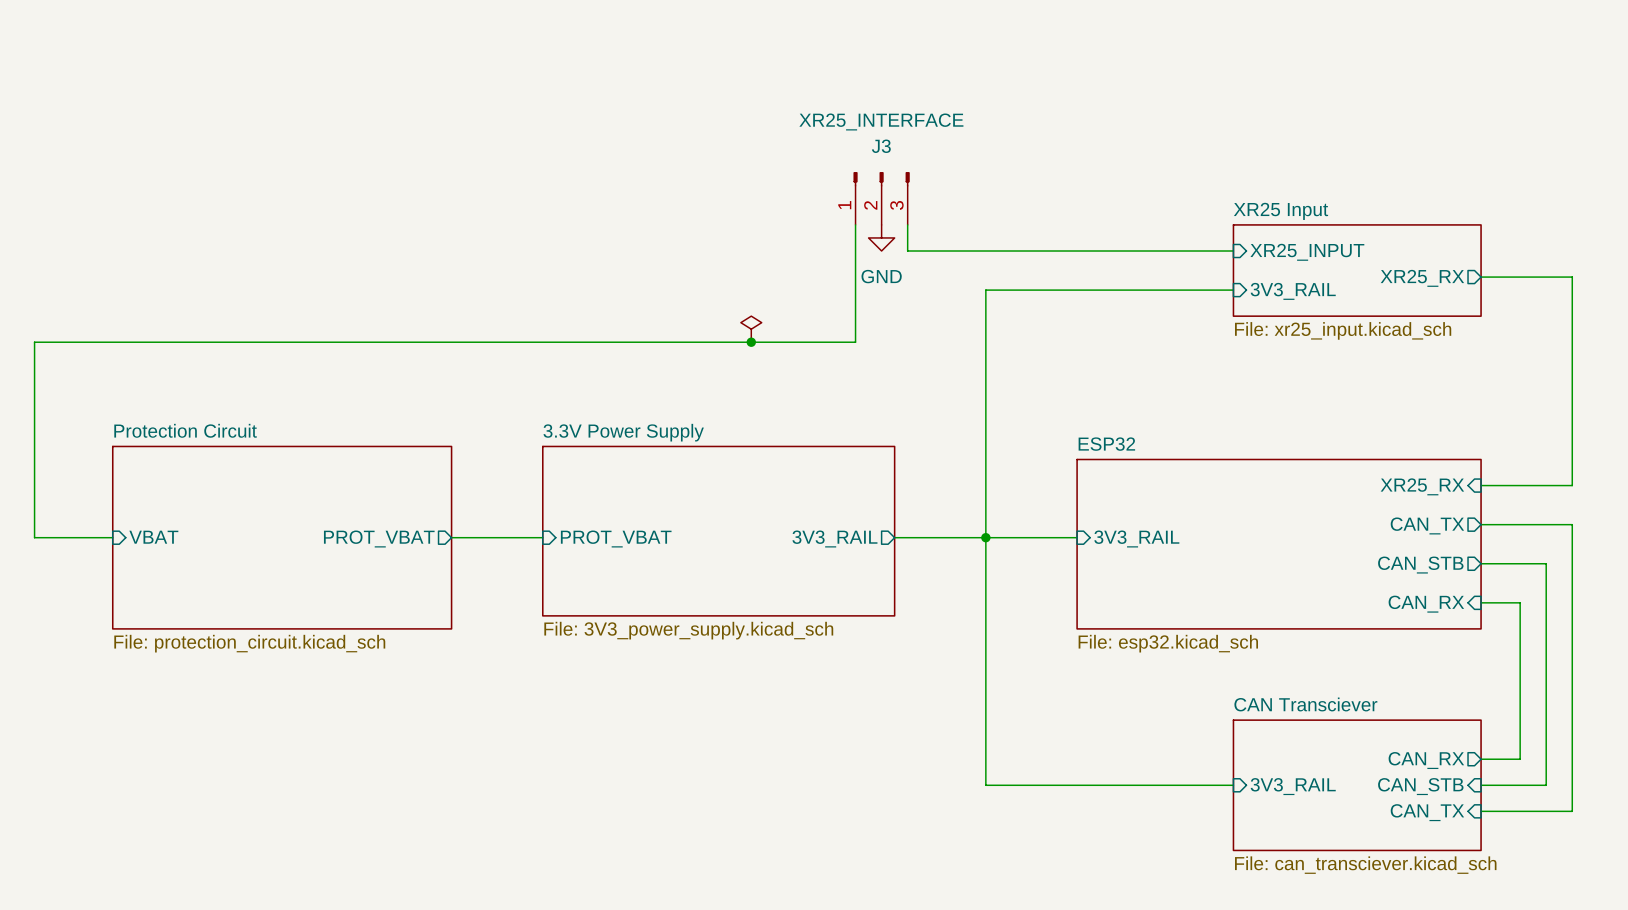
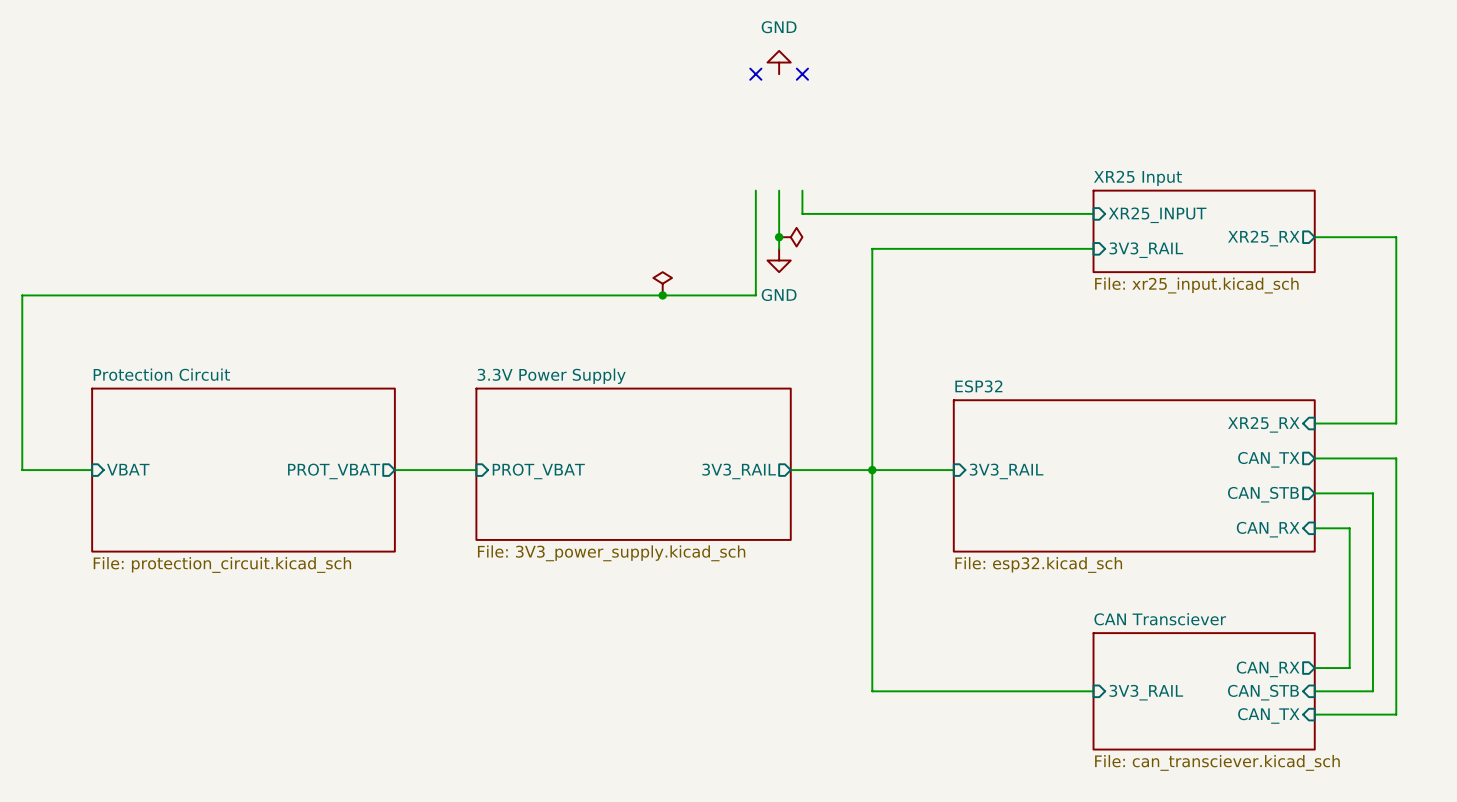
power symbol: none -> GND (779, 62)
no-connect mark: none -> (755, 74)
no-connect mark: none -> (802, 74)
J3: XR25_INTERFACE (881, 198) -> none
wire: none -> (779, 190) (779, 248)
power symbol position: GND (881, 237) -> GND (779, 260)
junction: none -> (779, 237)
power symbol: none -> (790, 237)

